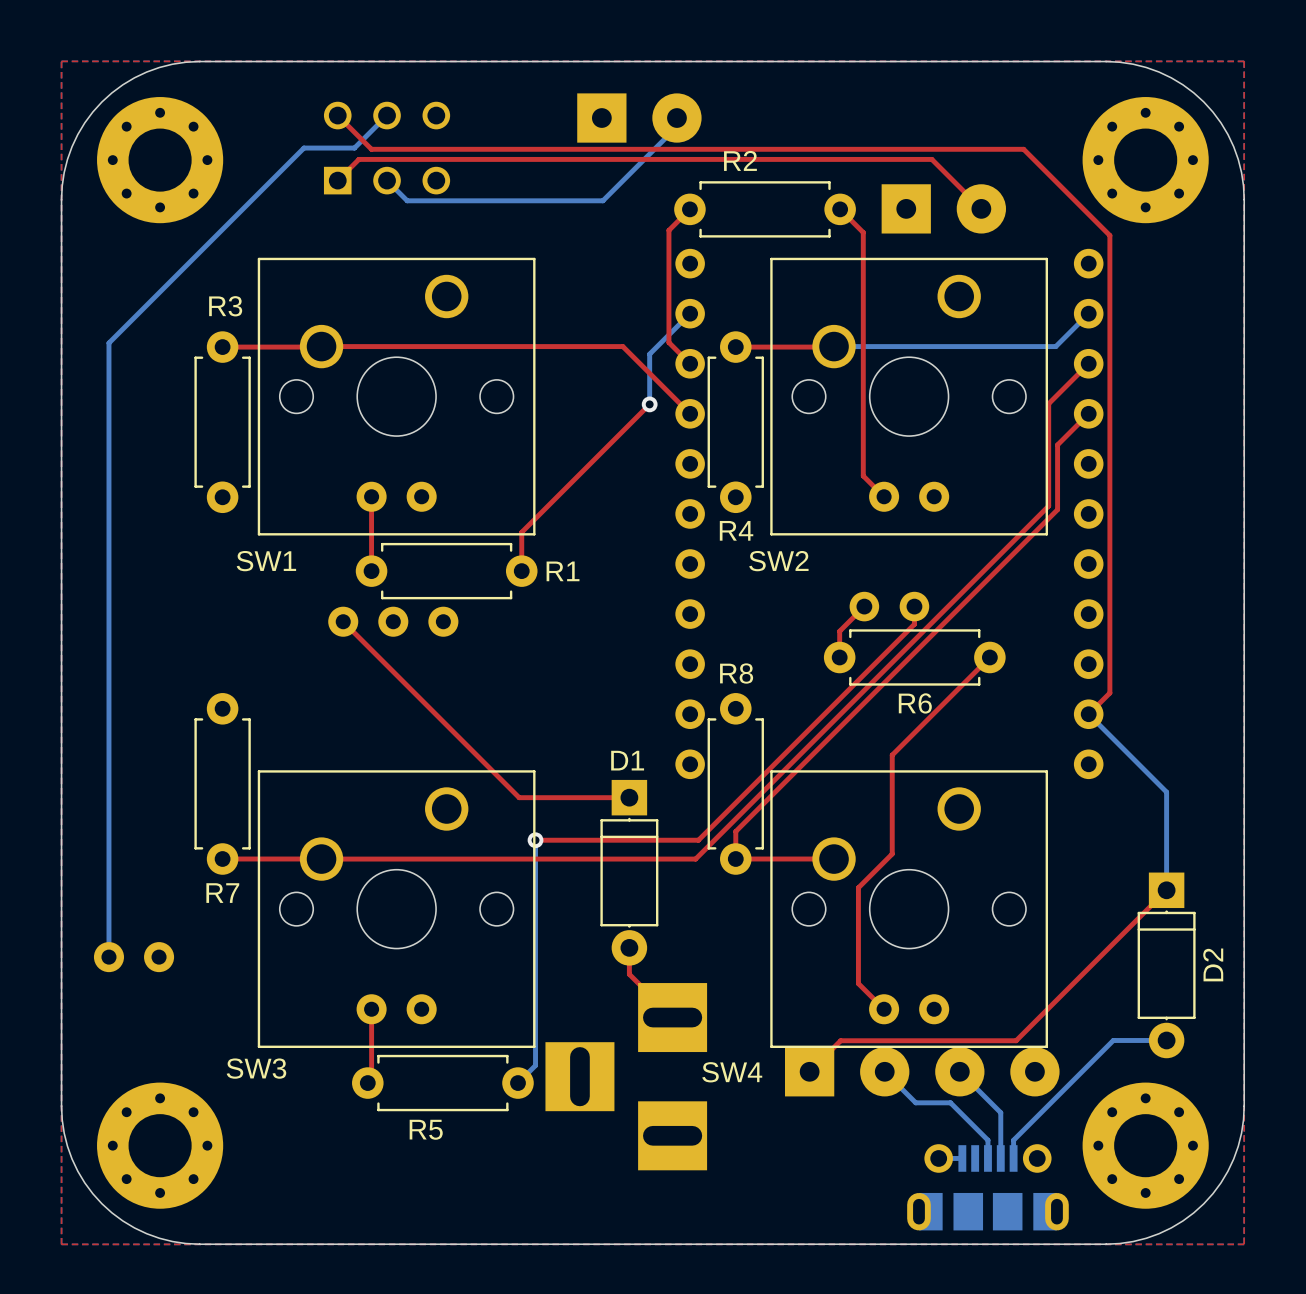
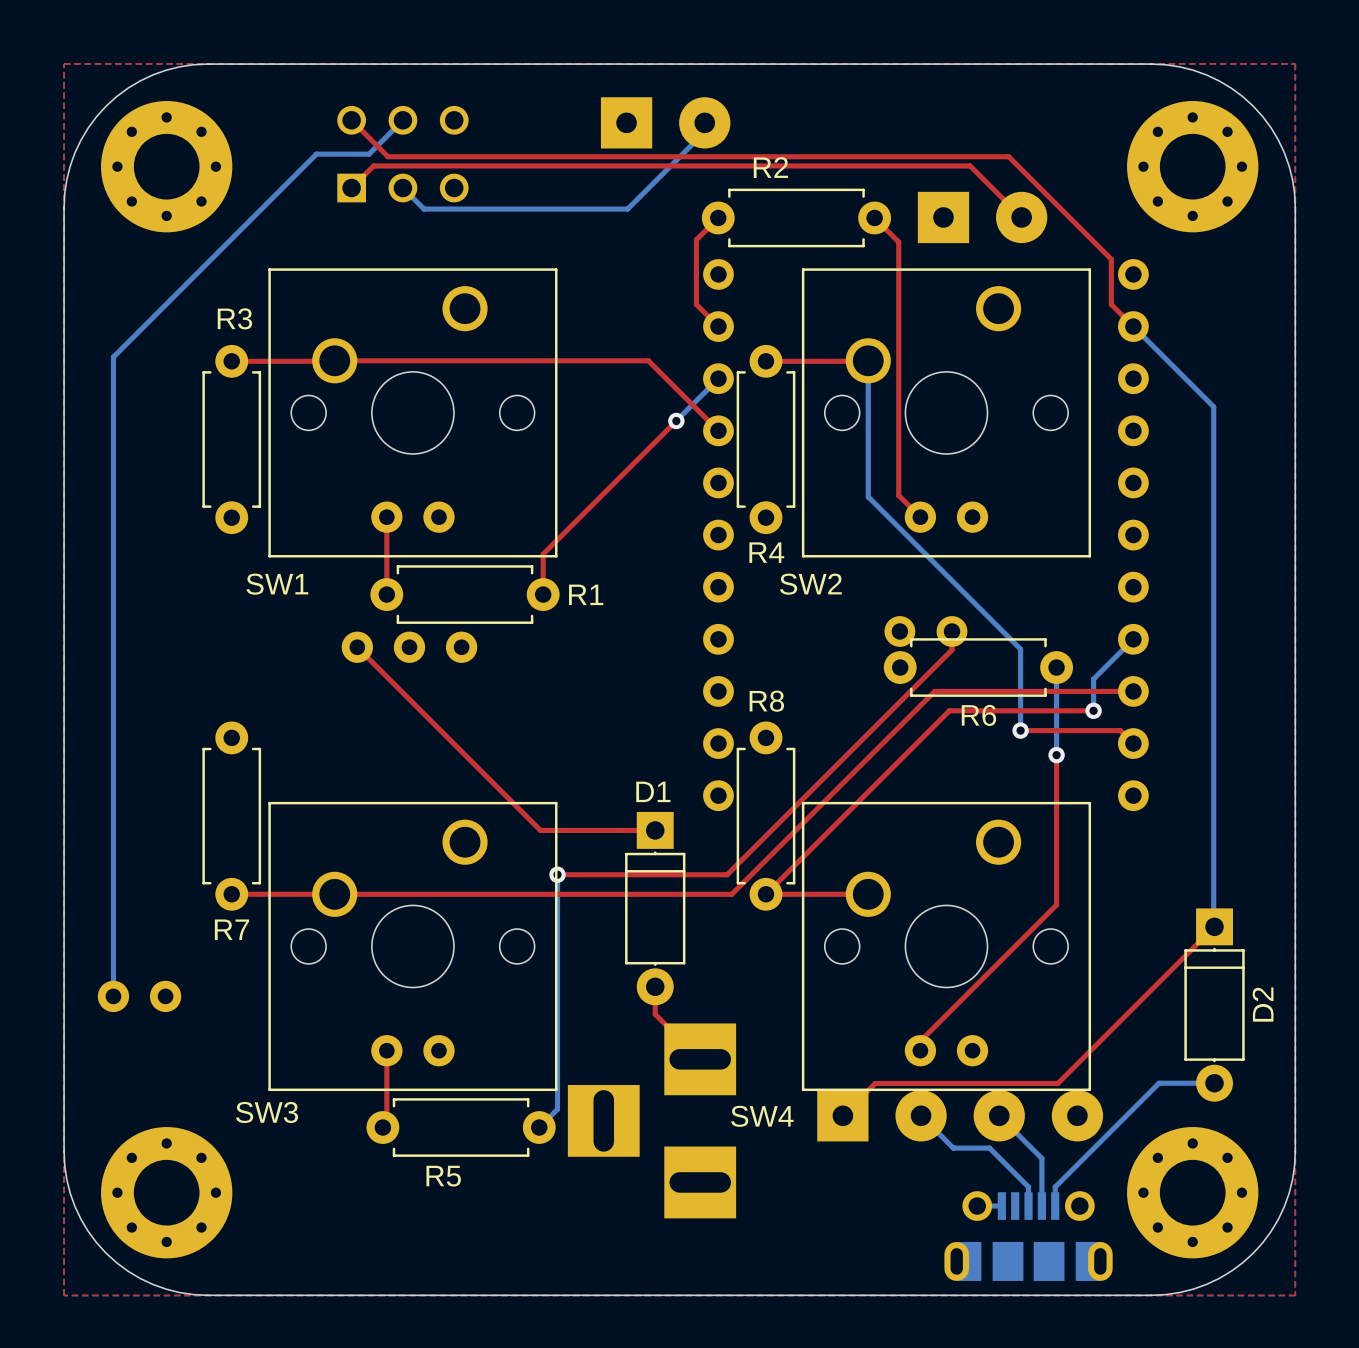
top track: (371, 149) (1023, 149) (1109, 235) (1109, 693) (1088, 714) -> (386, 155) (1008, 156) (1111, 259) (1111, 304) (1133, 326)
top track: (668, 292) (668, 342) (690, 363) -> (696, 304) (718, 326)
bottom track: (690, 313) (649, 354) (649, 404) -> (718, 378) (676, 420)
bottom track: (1082, 319) (1055, 346) (834, 346) -> (1020, 730) (1020, 649) (868, 496) (868, 360)
top track: (1088, 363) (1048, 403) (1048, 506) (695, 859) -> (1133, 691) (934, 691) (731, 894) (724, 894)
top track: (1088, 413) (1057, 444) (1057, 509) (735, 831) (735, 859) -> (1093, 710) (949, 710) (766, 894)
top track: (864, 606) (839, 631) (839, 657) -> none
bottom track: none -> (1133, 639) (1093, 679) (1093, 710)
bottom track: none -> (1056, 667) (1056, 755)
R6 position: (914, 657) -> (978, 667)
top track: (989, 657) (892, 755) (892, 853) (858, 887) (858, 983) (884, 1009) -> (1056, 755) (1056, 904) (920, 1041) (920, 1050)
via: none -> (1093, 710)
top track: none -> (1020, 730) (1120, 730) (1133, 743)
via: none -> (1020, 730)
bottom track: (1088, 714) (1166, 792) (1166, 890) -> (1133, 326) (1213, 406) (1214, 926)
via: none -> (1056, 755)

